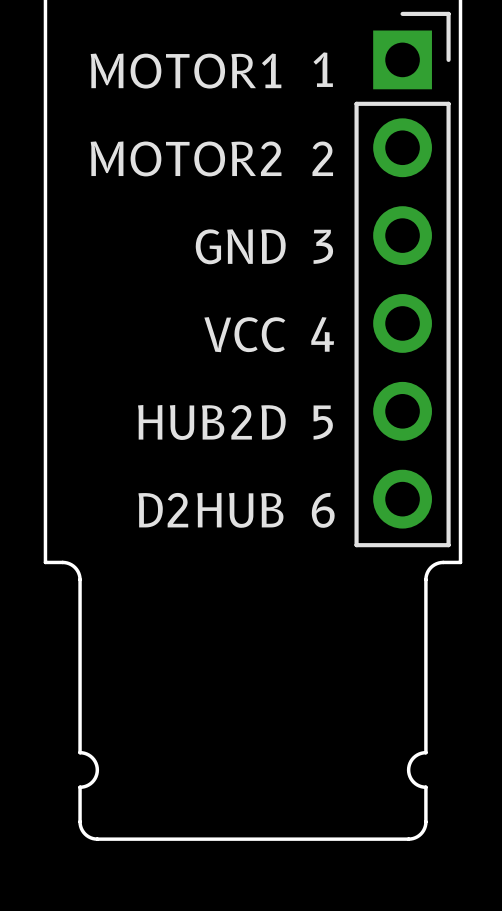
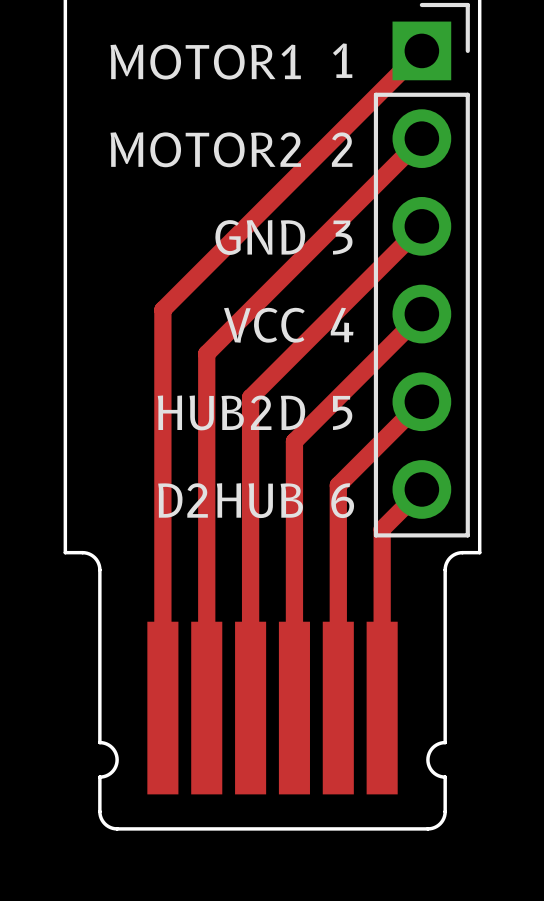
track: none -> (421, 50) (162, 309) (162, 708)
track: none -> (421, 138) (206, 353) (206, 708)
track: none -> (421, 226) (250, 397) (250, 708)
track: none -> (421, 314) (294, 441) (294, 708)
track: none -> (421, 401) (338, 485) (338, 708)
track: none -> (421, 489) (382, 529) (382, 708)
part: none -> (272, 708)

